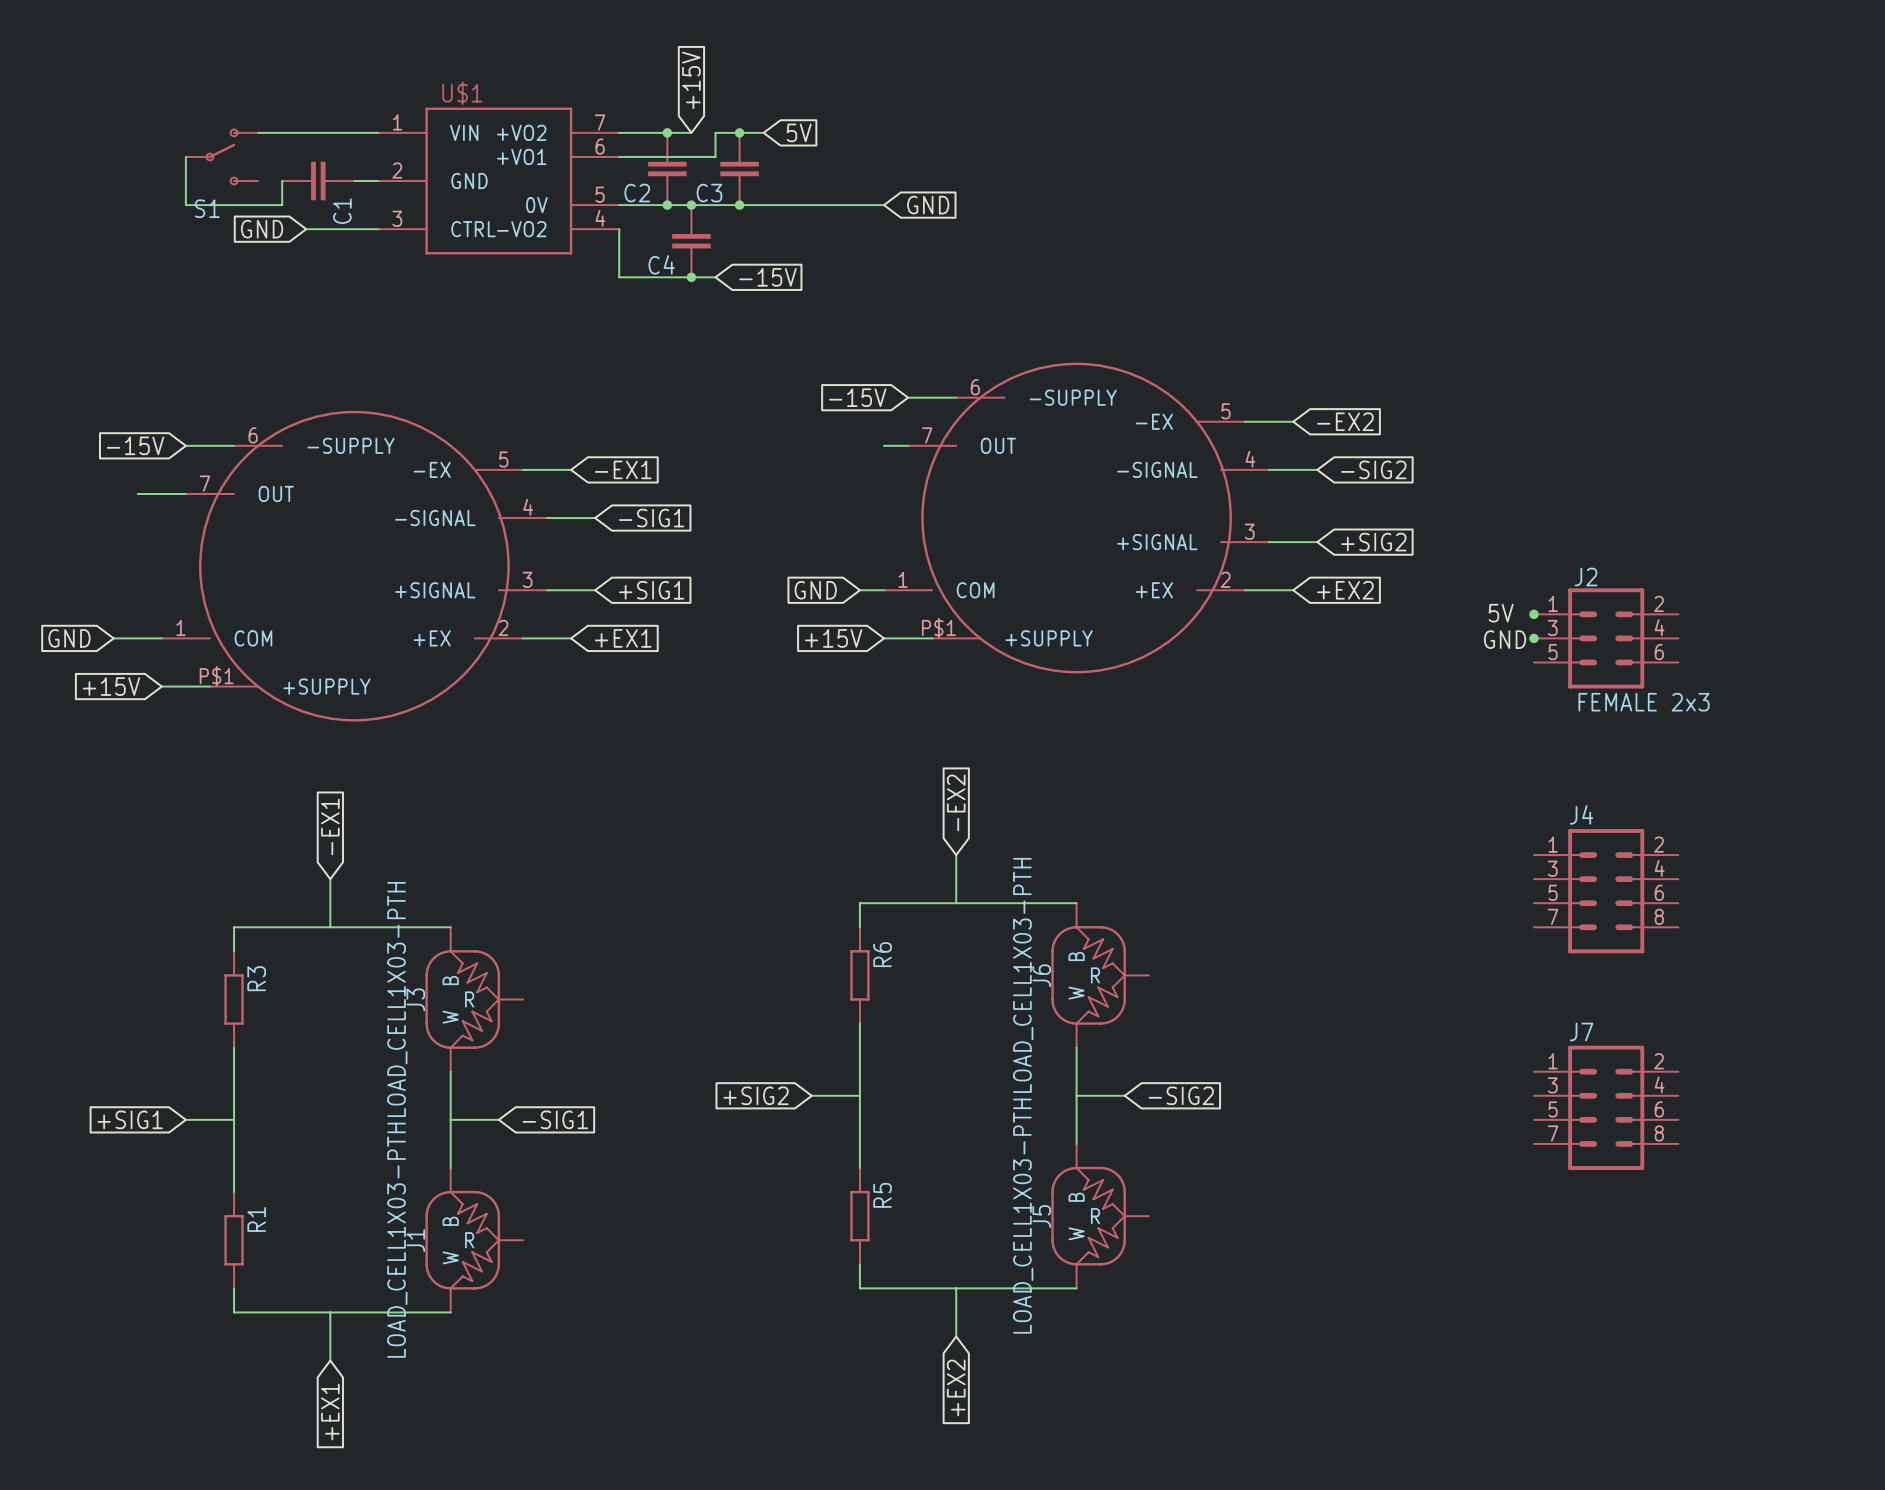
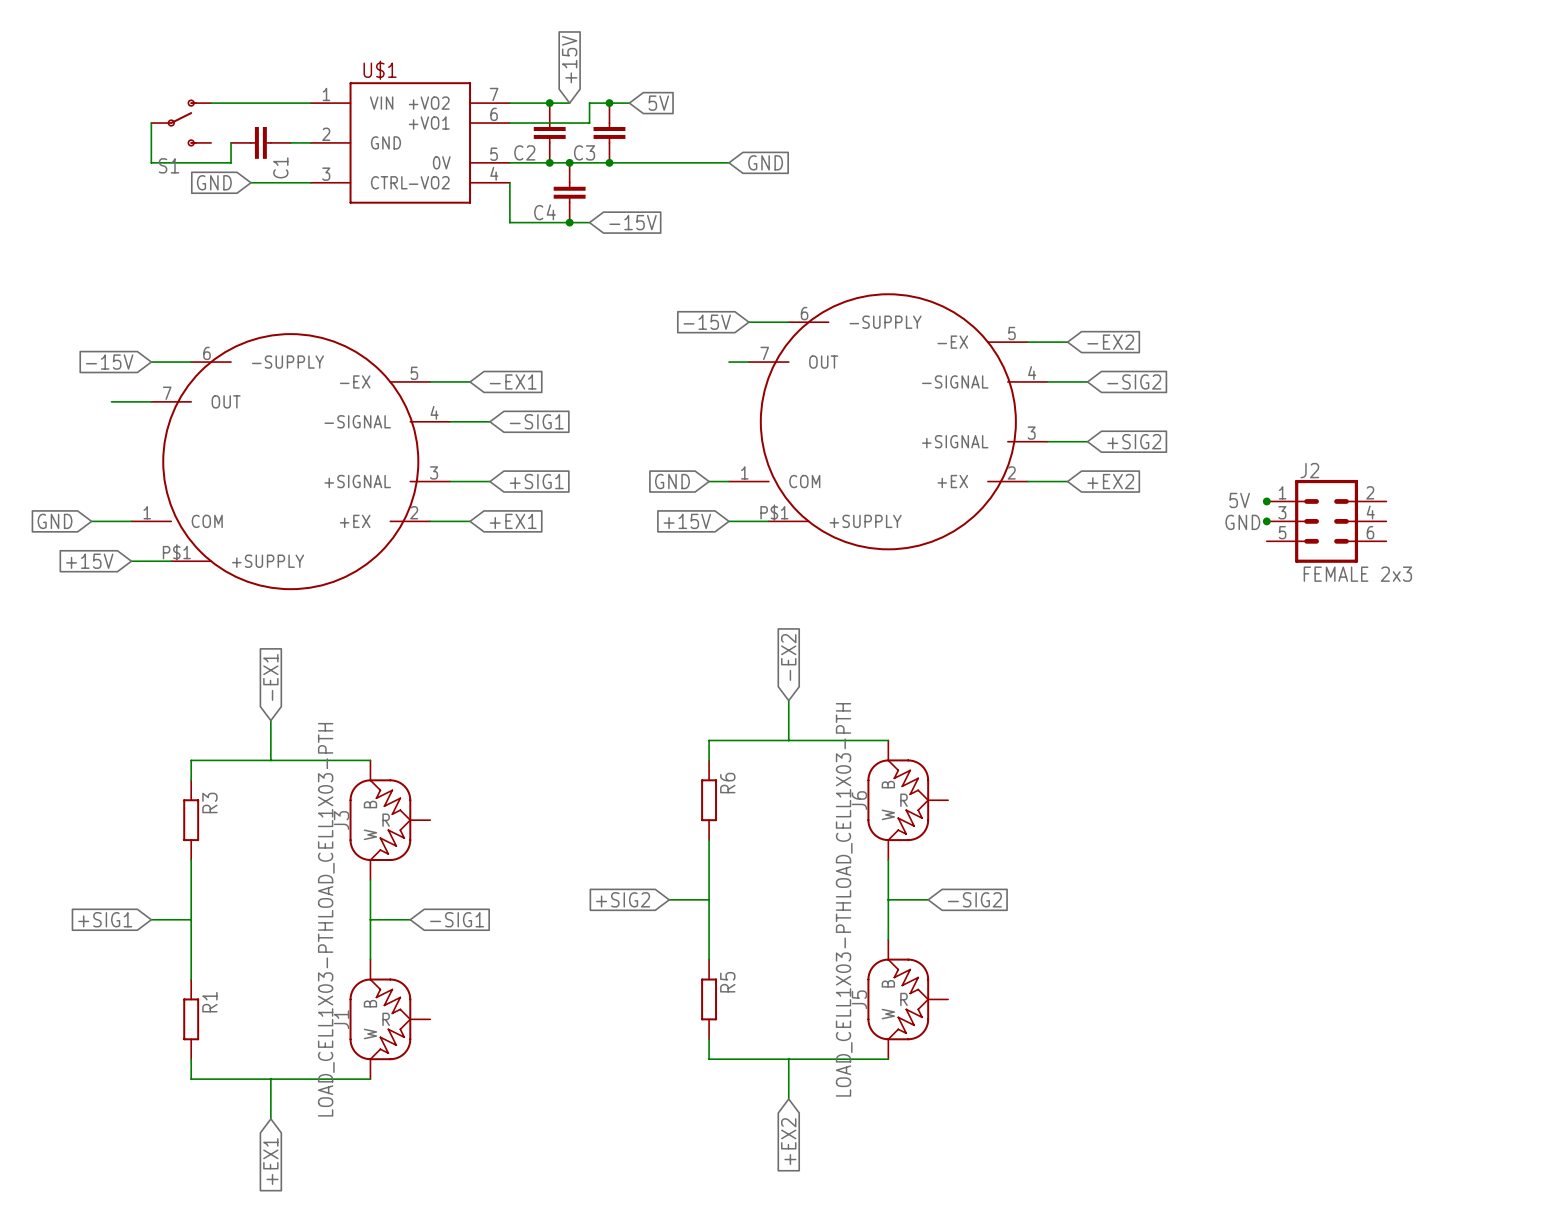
J4: (1606, 891) -> none
J7: (1606, 1107) -> none

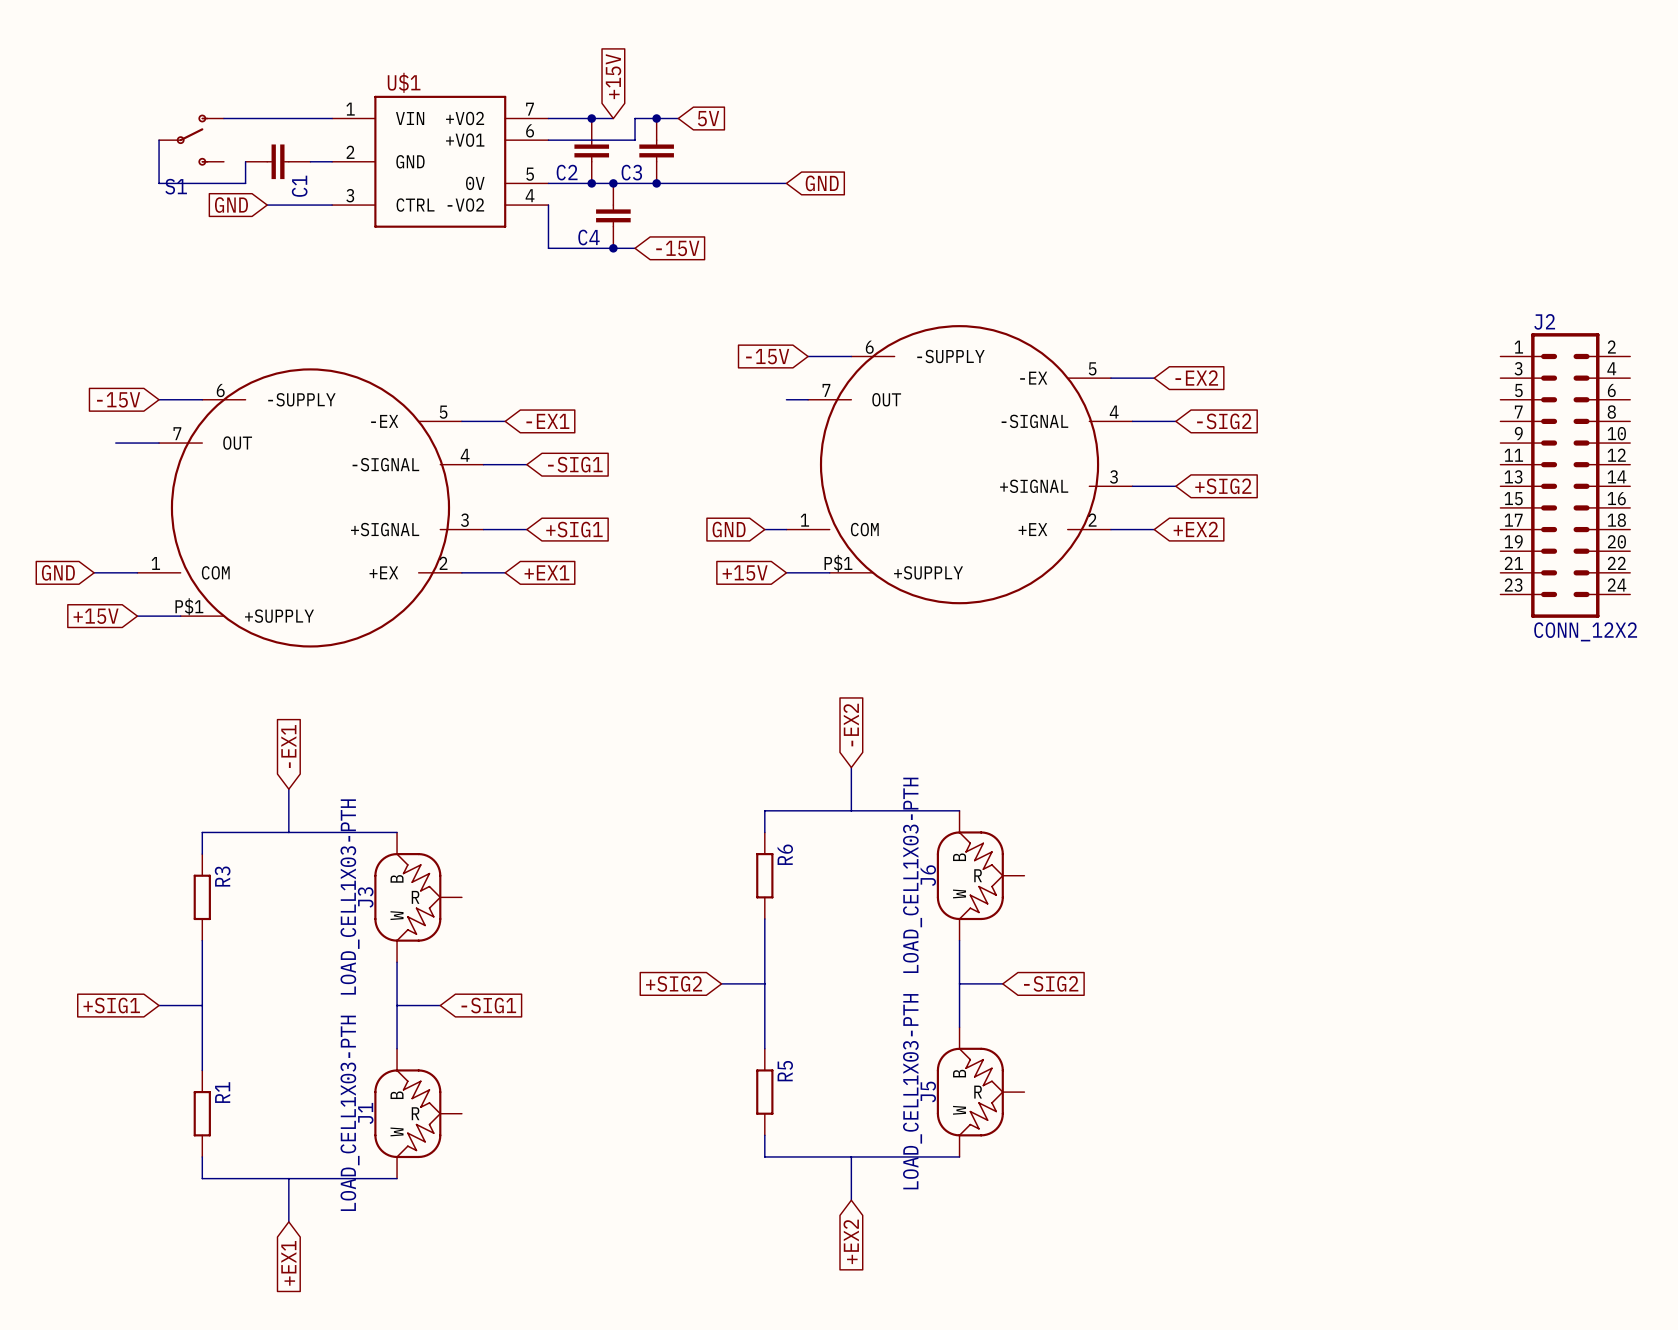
J2 name position: J2 (1309, 470) -> J2 (1544, 321)
J2 symbol: [1266, 479, 1387, 563] -> [1500, 333, 1631, 618]
label: 5V (1239, 500) -> none
junction: (1266, 501) -> none
junction: (1266, 521) -> none
label: GND (1242, 522) -> none
J2 value: FEMALE 2x3 (1357, 574) -> CONN_12X2 (1585, 631)

